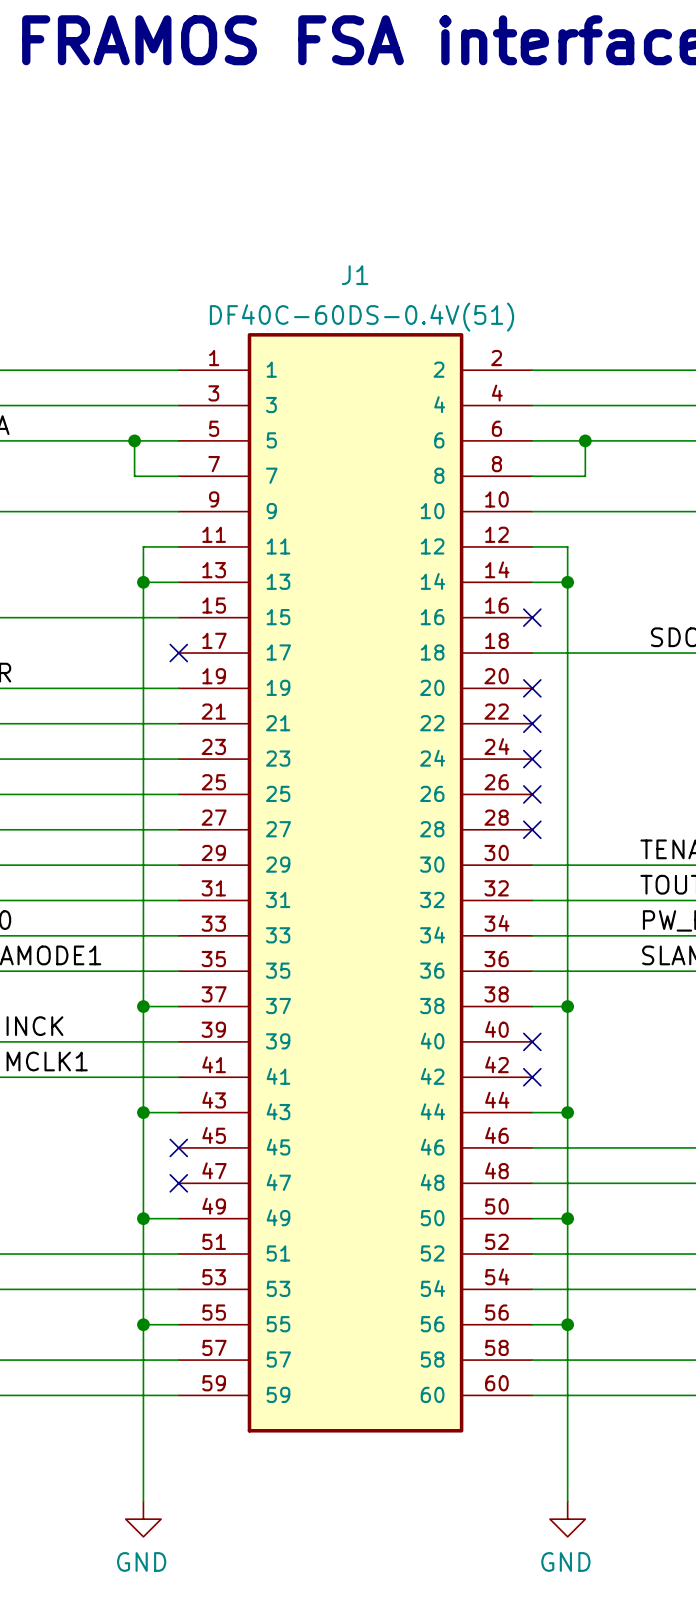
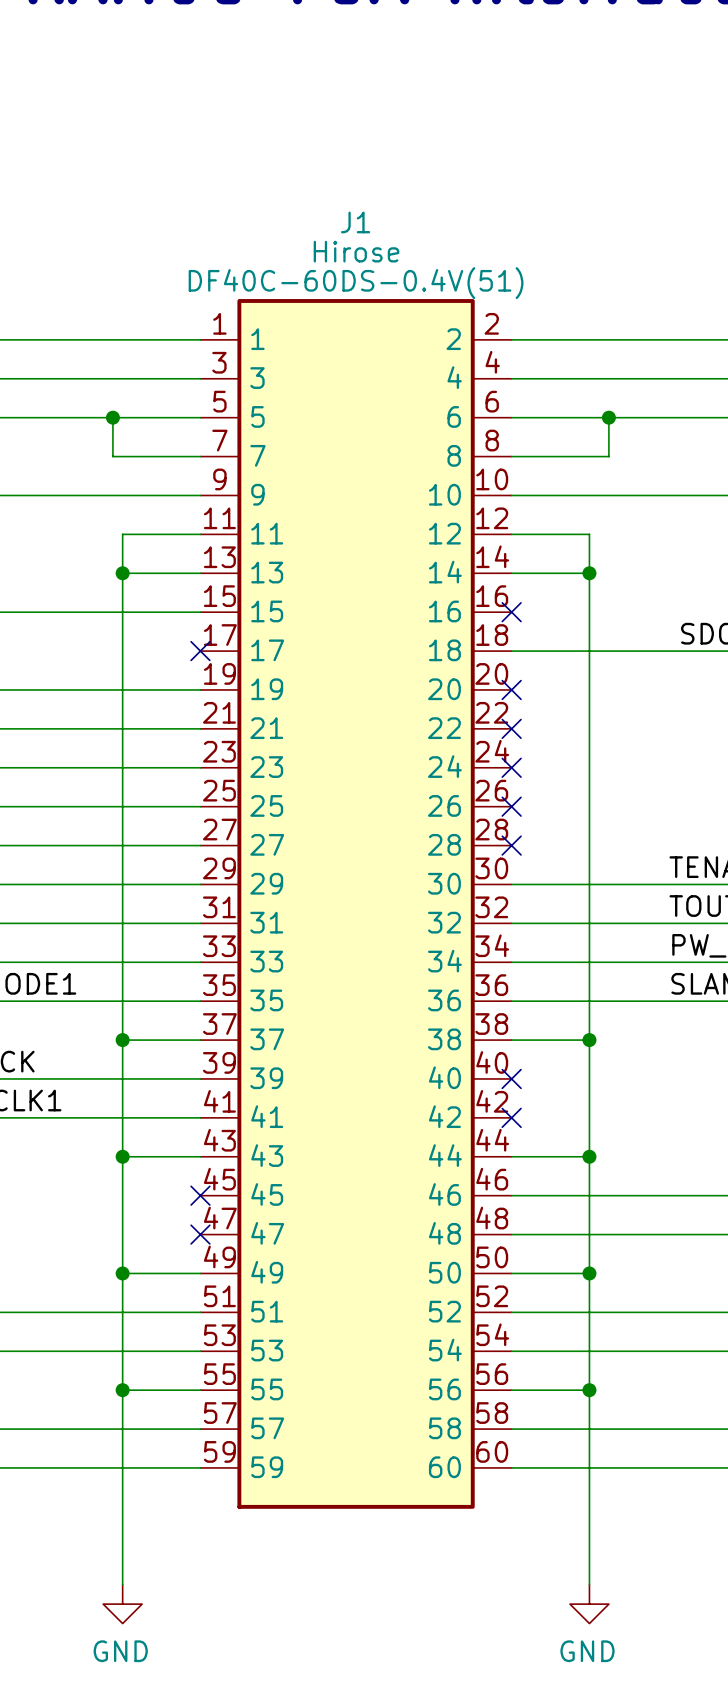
J1 text: none -> Hirose (356, 251)
J1 value: DF40C-60DS-0.4V(51) (361, 317) -> none
J1 text: none -> DF40C-60DS-0.4V(51) (356, 283)
J1 symbol: [178, 333, 533, 1433] -> [200, 299, 512, 1509]
no-connect mark position: (532, 617) -> (511, 612)
no-connect mark position: (178, 653) -> (200, 651)
no-connect mark: none -> (511, 689)
no-connect mark: (532, 688) -> none
no-connect mark: none -> (511, 728)
no-connect mark: (532, 723) -> none
no-connect mark: none -> (511, 767)
no-connect mark: (532, 759) -> none
no-connect mark: none -> (511, 806)
no-connect mark: (532, 794) -> none
no-connect mark: none -> (511, 845)
no-connect mark: (532, 829) -> none
no-connect mark: none -> (511, 1078)
no-connect mark: (532, 1041) -> none
no-connect mark: none -> (511, 1117)
no-connect mark: (532, 1077) -> none
no-connect mark: (178, 1147) -> none
no-connect mark: none -> (200, 1195)
no-connect mark: (178, 1183) -> none
no-connect mark: none -> (200, 1234)

